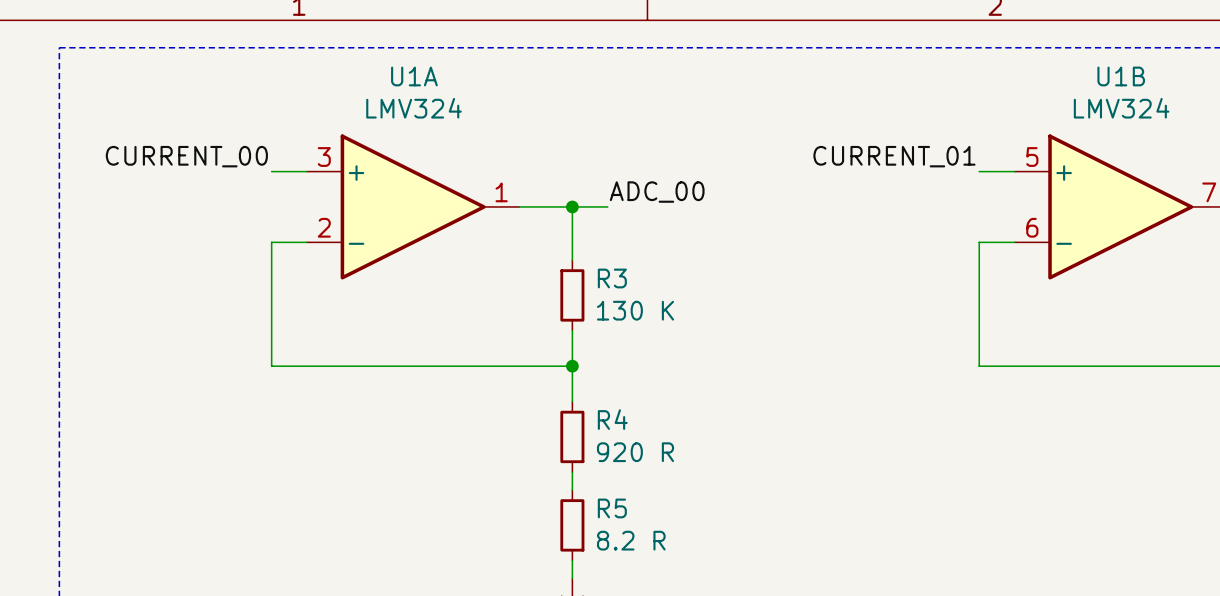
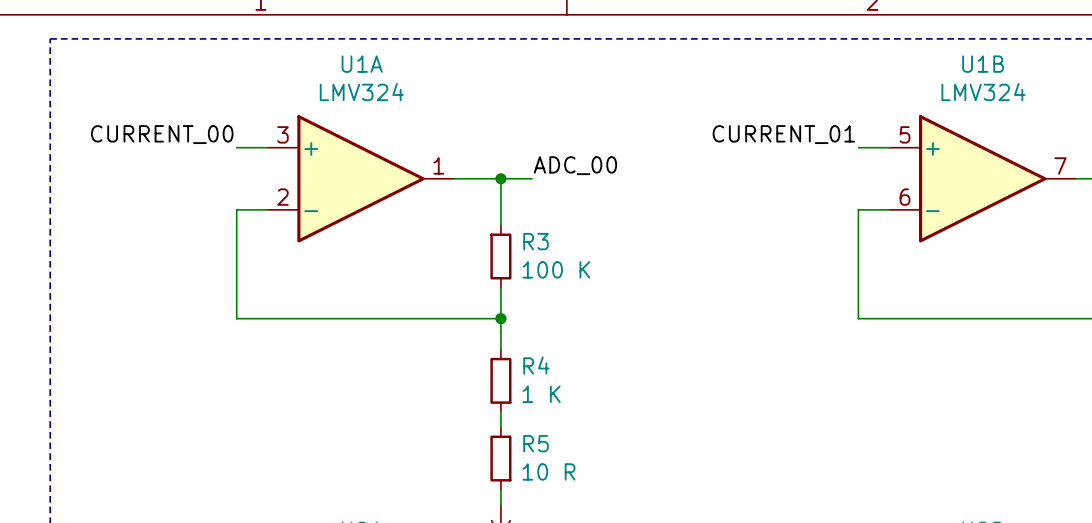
R3 value: 130 K (635, 310) -> 100 K (556, 269)
R4 value: 920 R (635, 452) -> 1 K (541, 394)
R5 value: 8.2 R (631, 540) -> 10 R (548, 471)

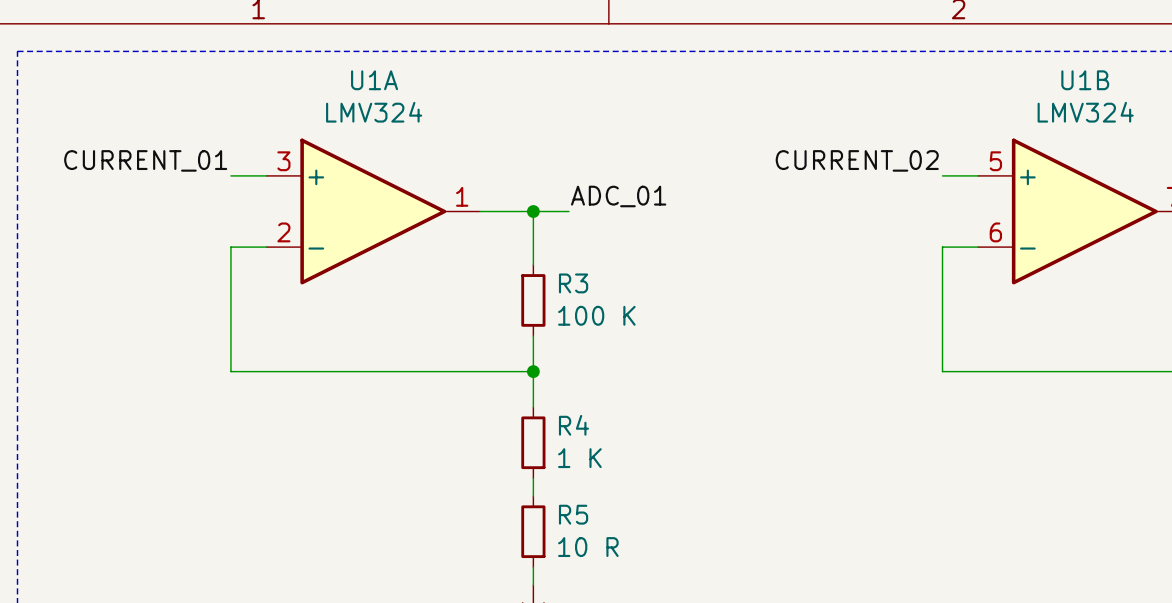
label: CURRENT_00 (162, 134) -> CURRENT_01 (145, 160)
label: CURRENT_01 (783, 134) -> CURRENT_02 (857, 160)
label: ADC_00 (575, 165) -> ADC_01 (618, 196)

